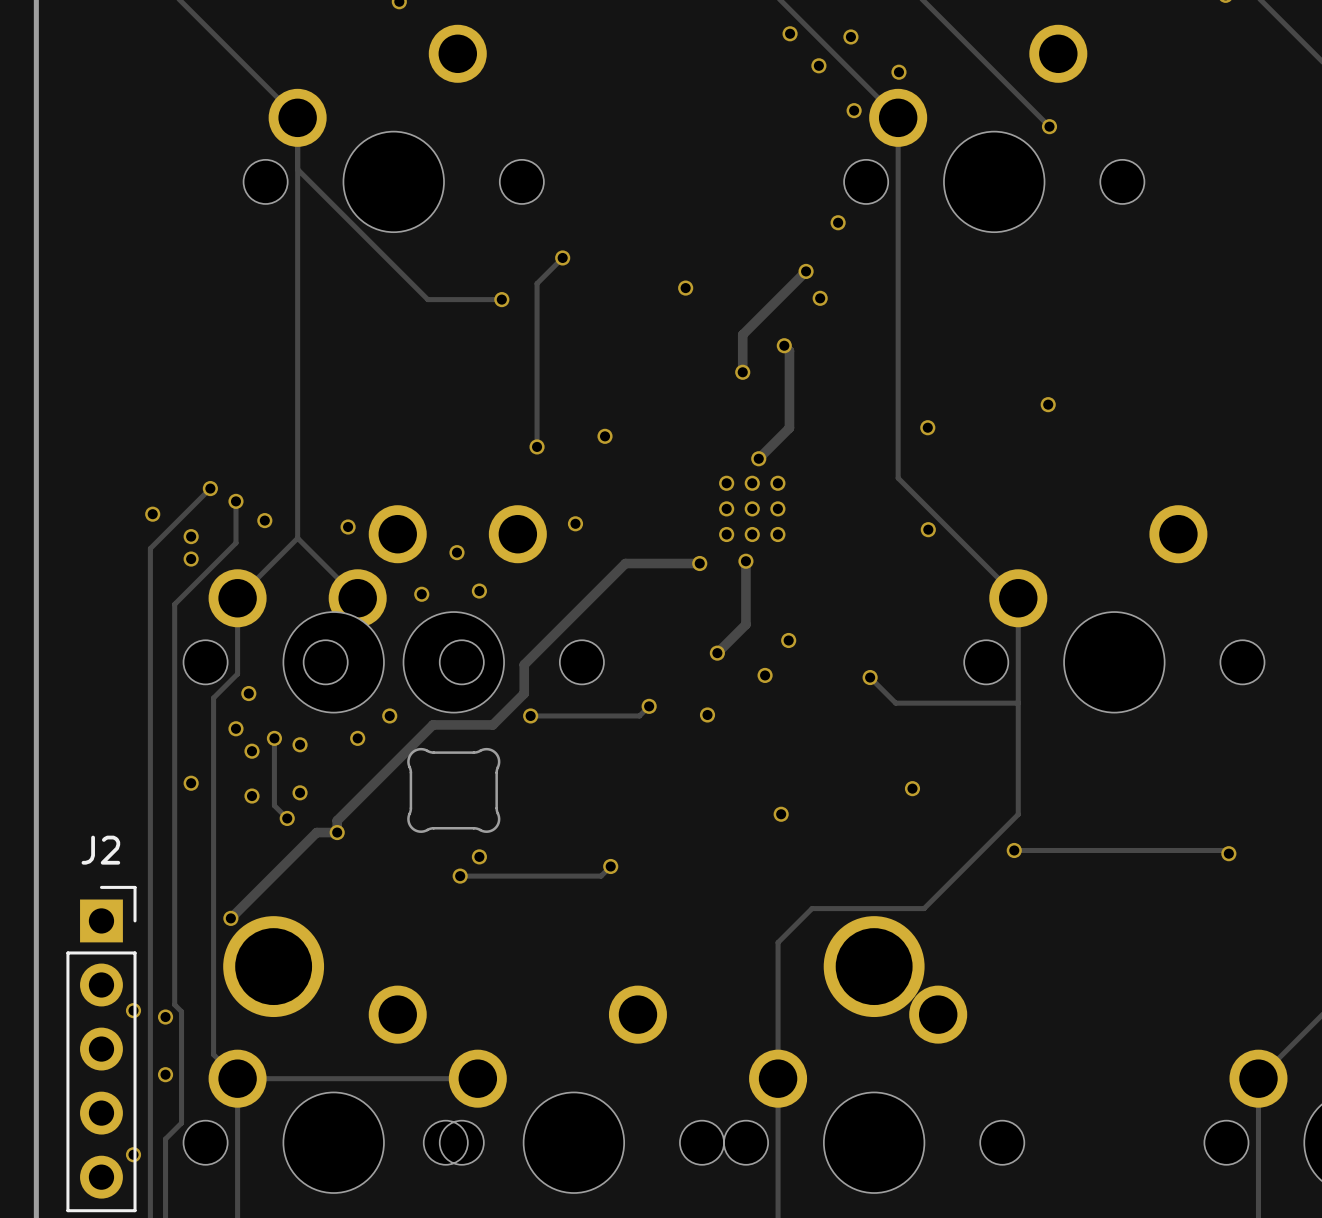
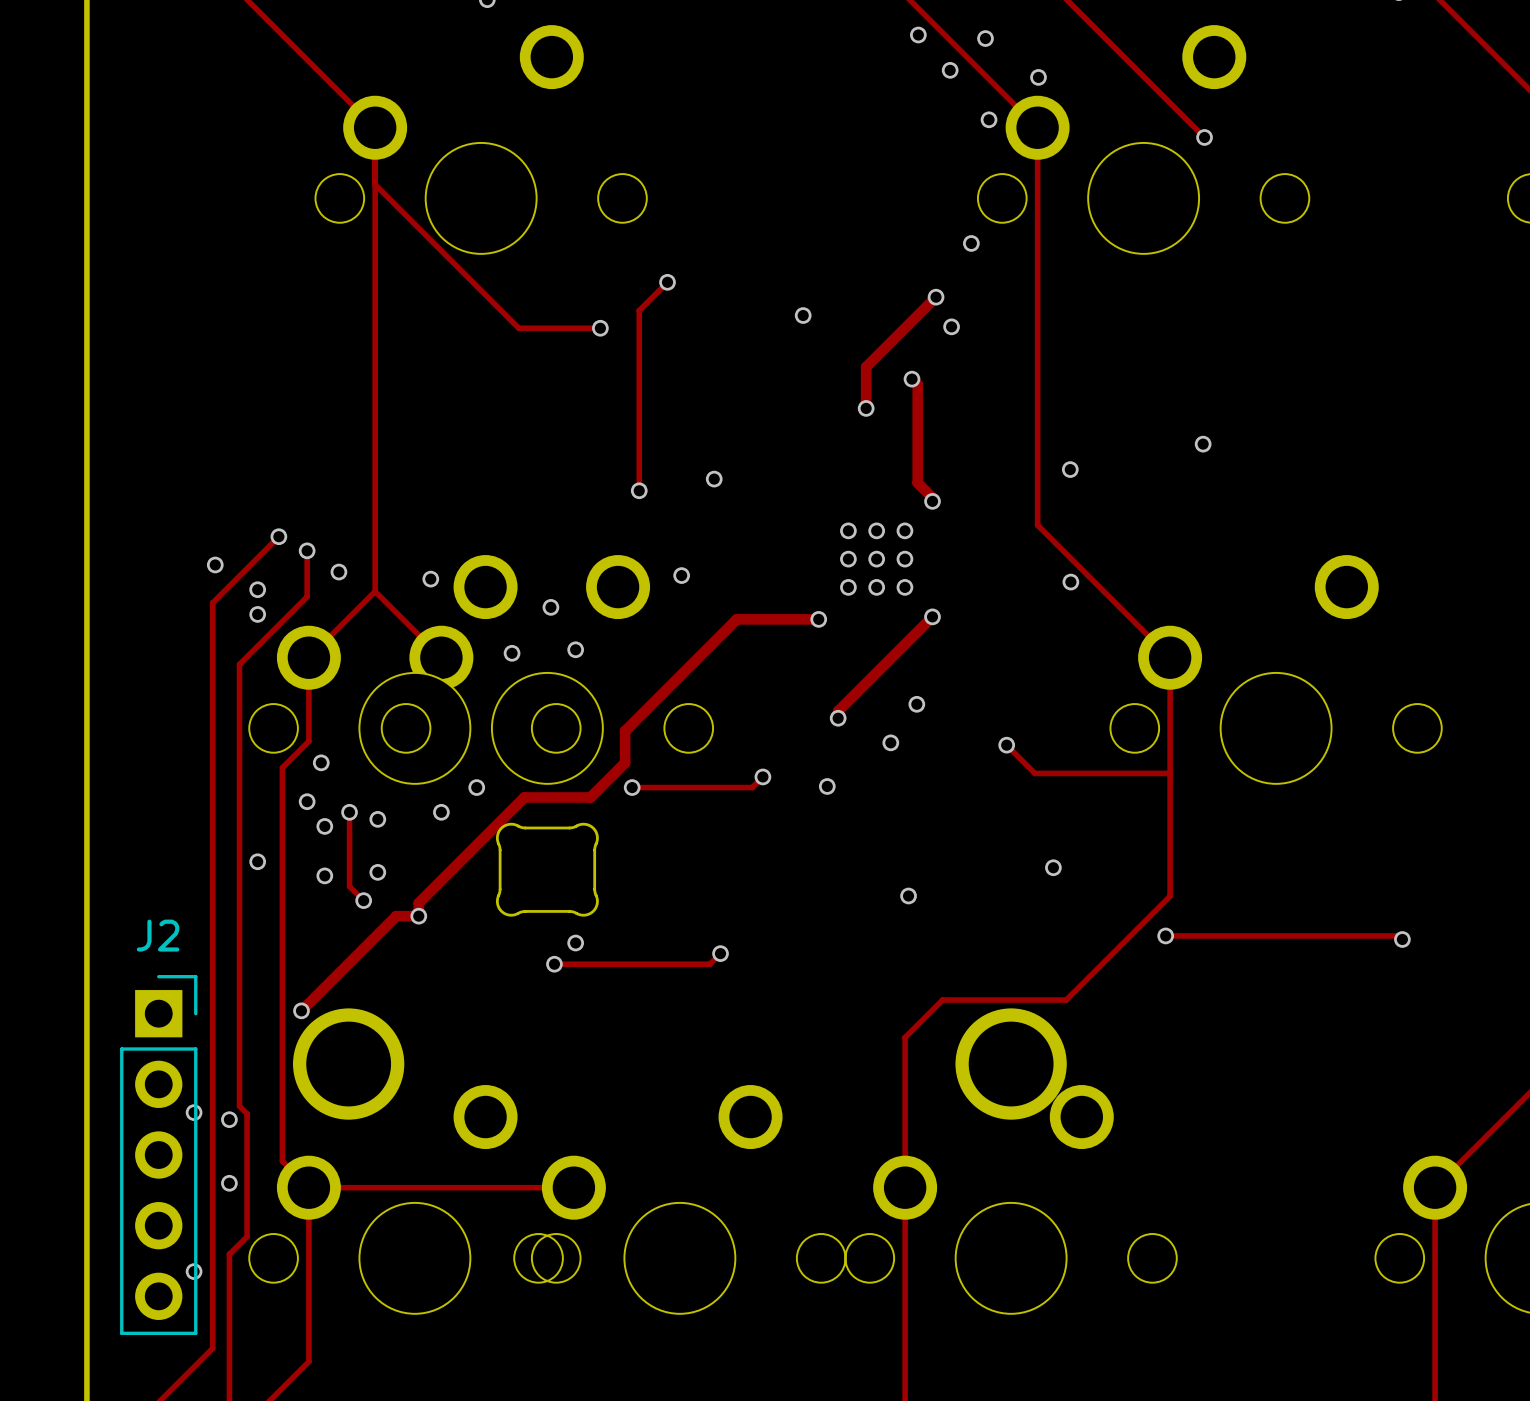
track: (789, 428) (758, 458) -> (917, 469) (917, 483) (932, 497) (932, 501)
via position: (758, 458) -> (932, 501)
track: (745, 561) (745, 624) (717, 653) -> (932, 616) (838, 711) (838, 718)
via: (745, 561) -> none
via: none -> (932, 616)

